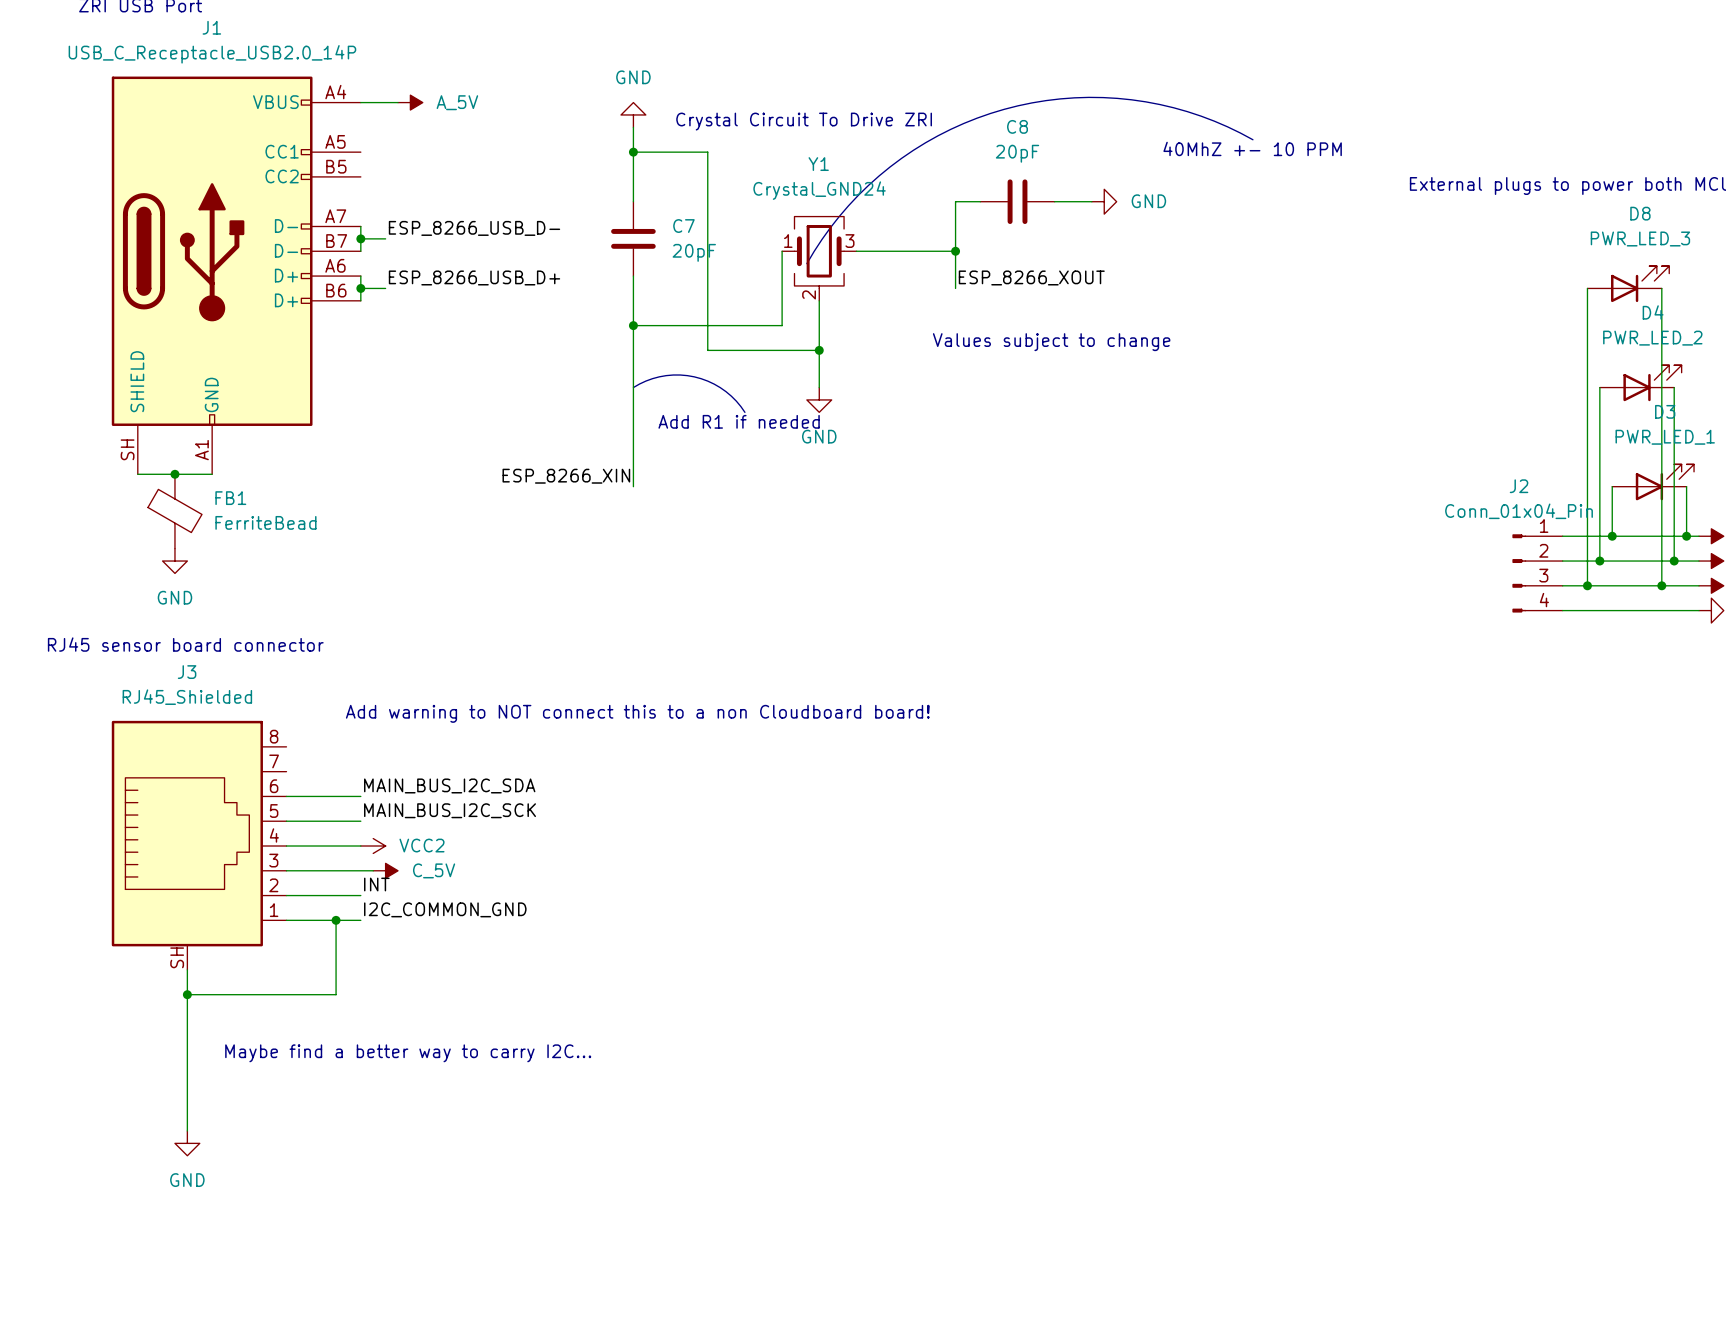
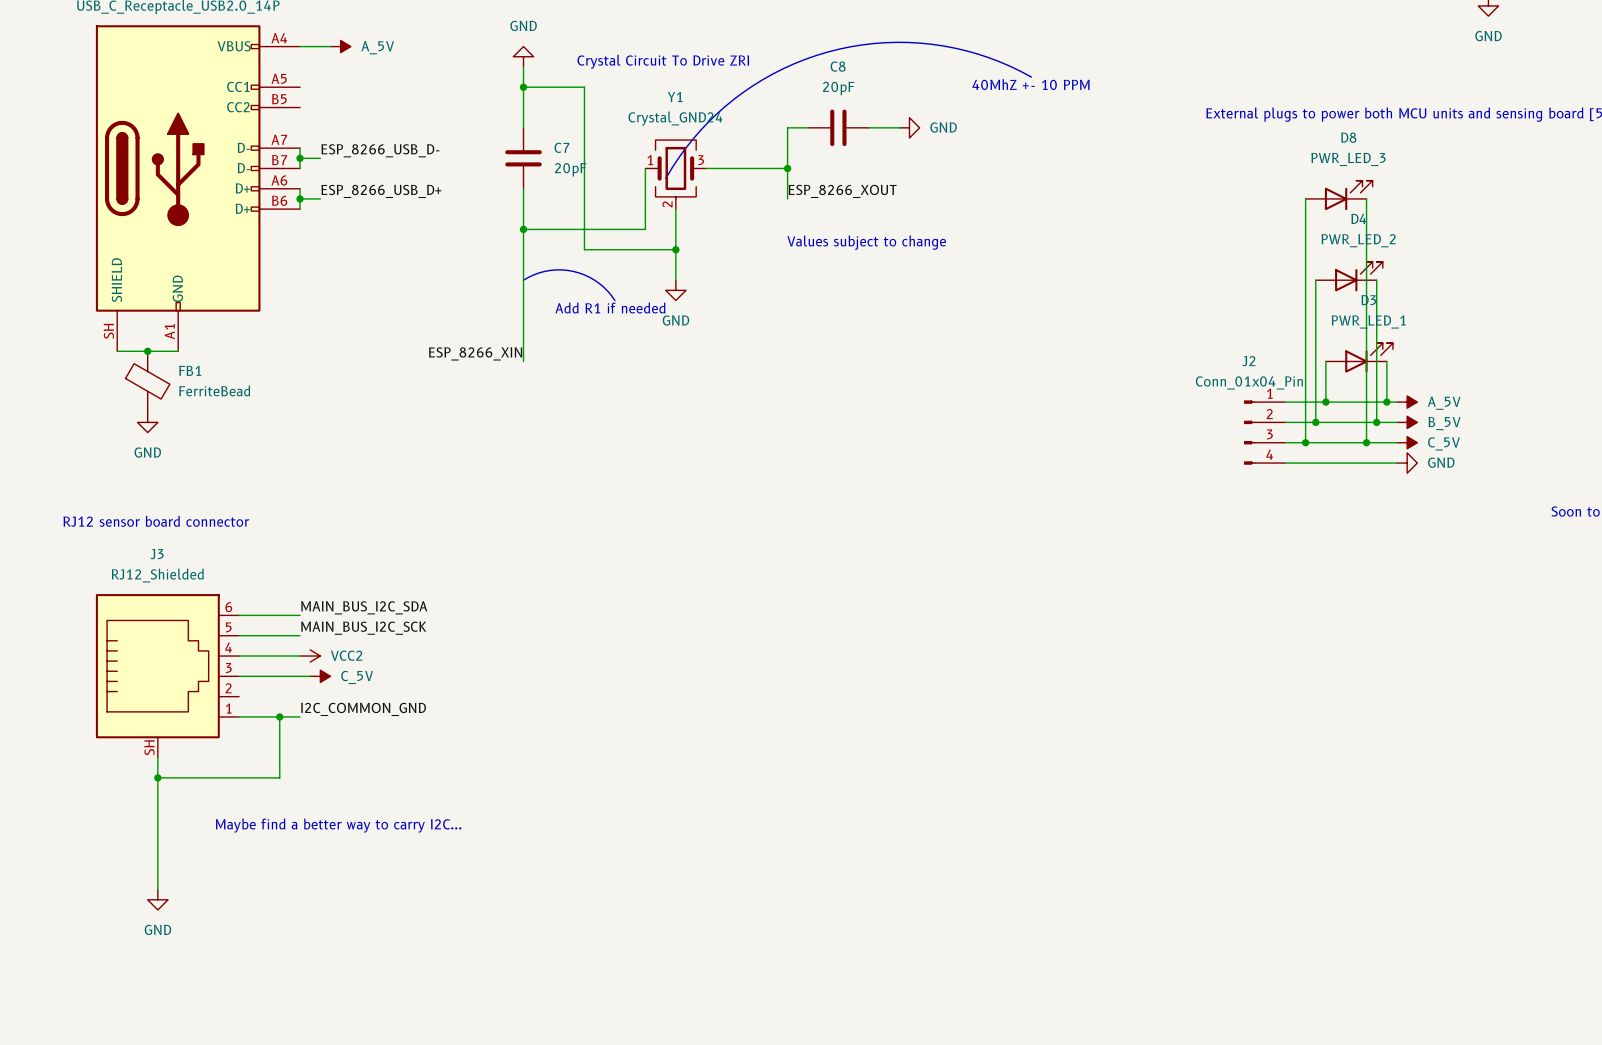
text: RJ45 sensor board connector (185, 644) -> none
J3 name position: J3 (187, 672) -> J3 (157, 554)
text: none -> RJ12 sensor board connector (156, 521)
J3 value: RJ45_Shielded (187, 697) -> RJ12_Shielded (157, 575)
text: Add warning to NOT connect this to a non Cloudboard board! (637, 713) -> none
J3 symbol: [111, 720, 287, 970] -> [95, 594, 240, 758]
label: INT (376, 884) -> none
wire: (286, 895) (360, 895) -> none

